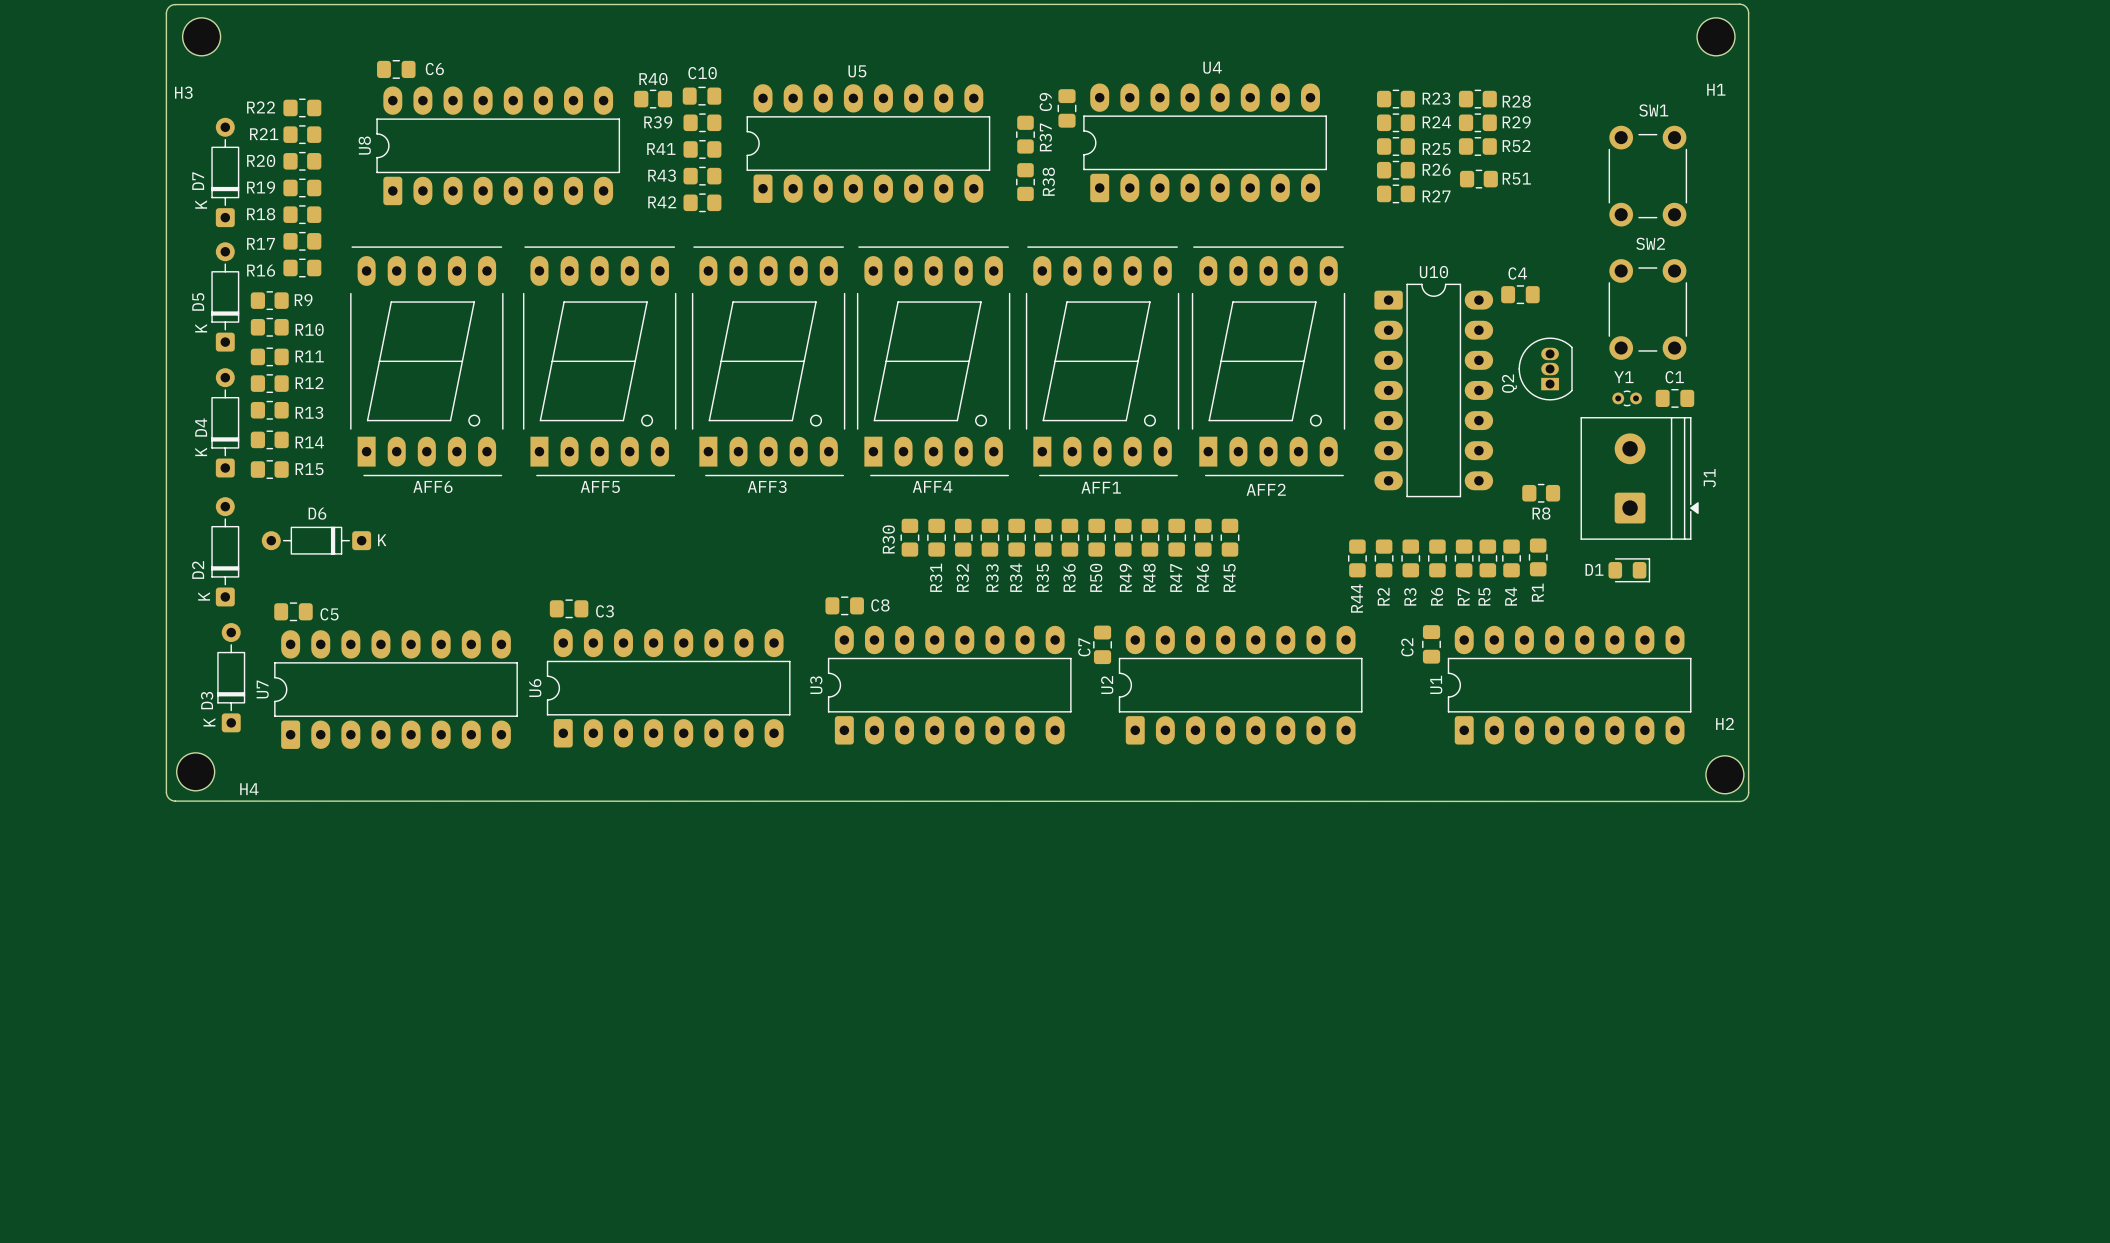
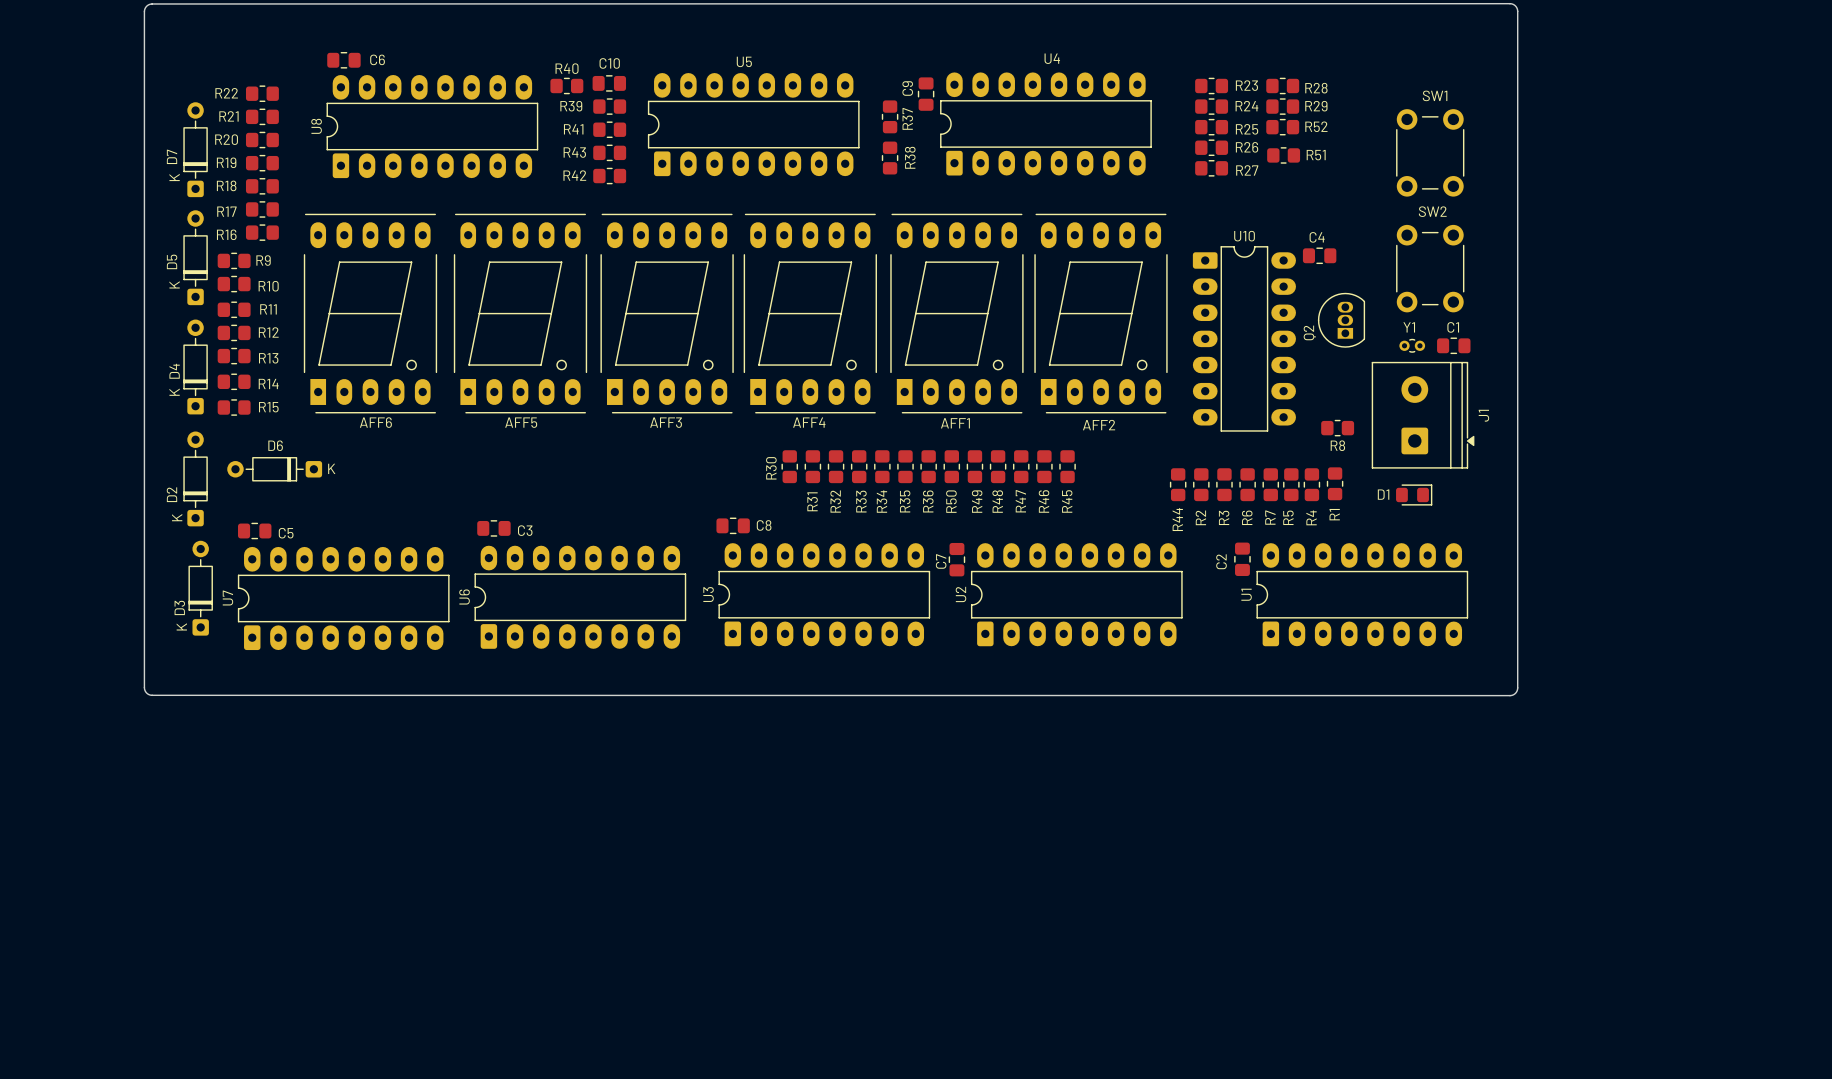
H3: (201, 36) -> none
H1: (1716, 36) -> none
H4: (195, 771) -> none
H2: (1724, 774) -> none

